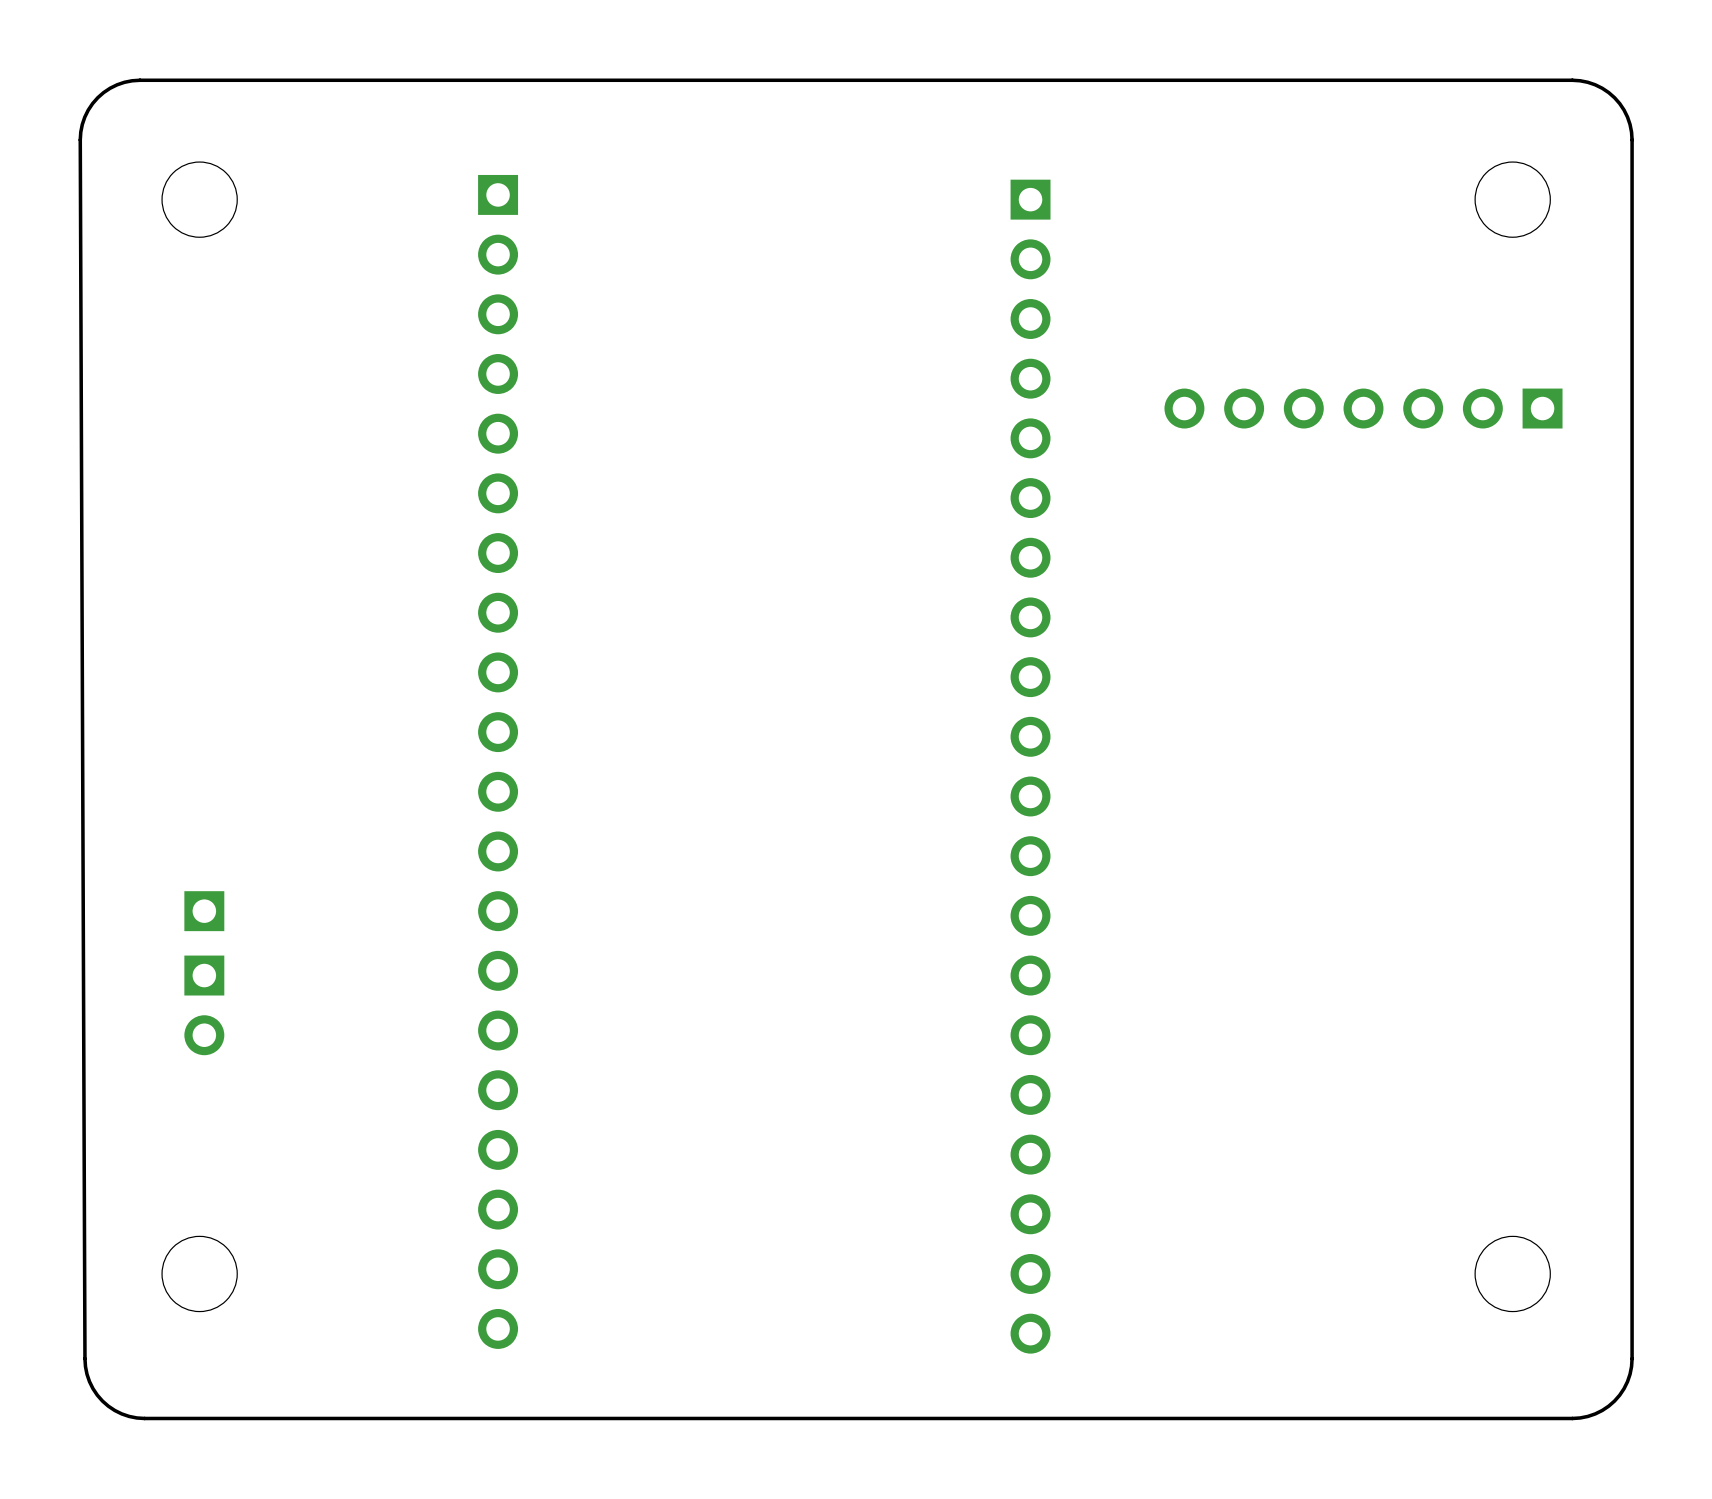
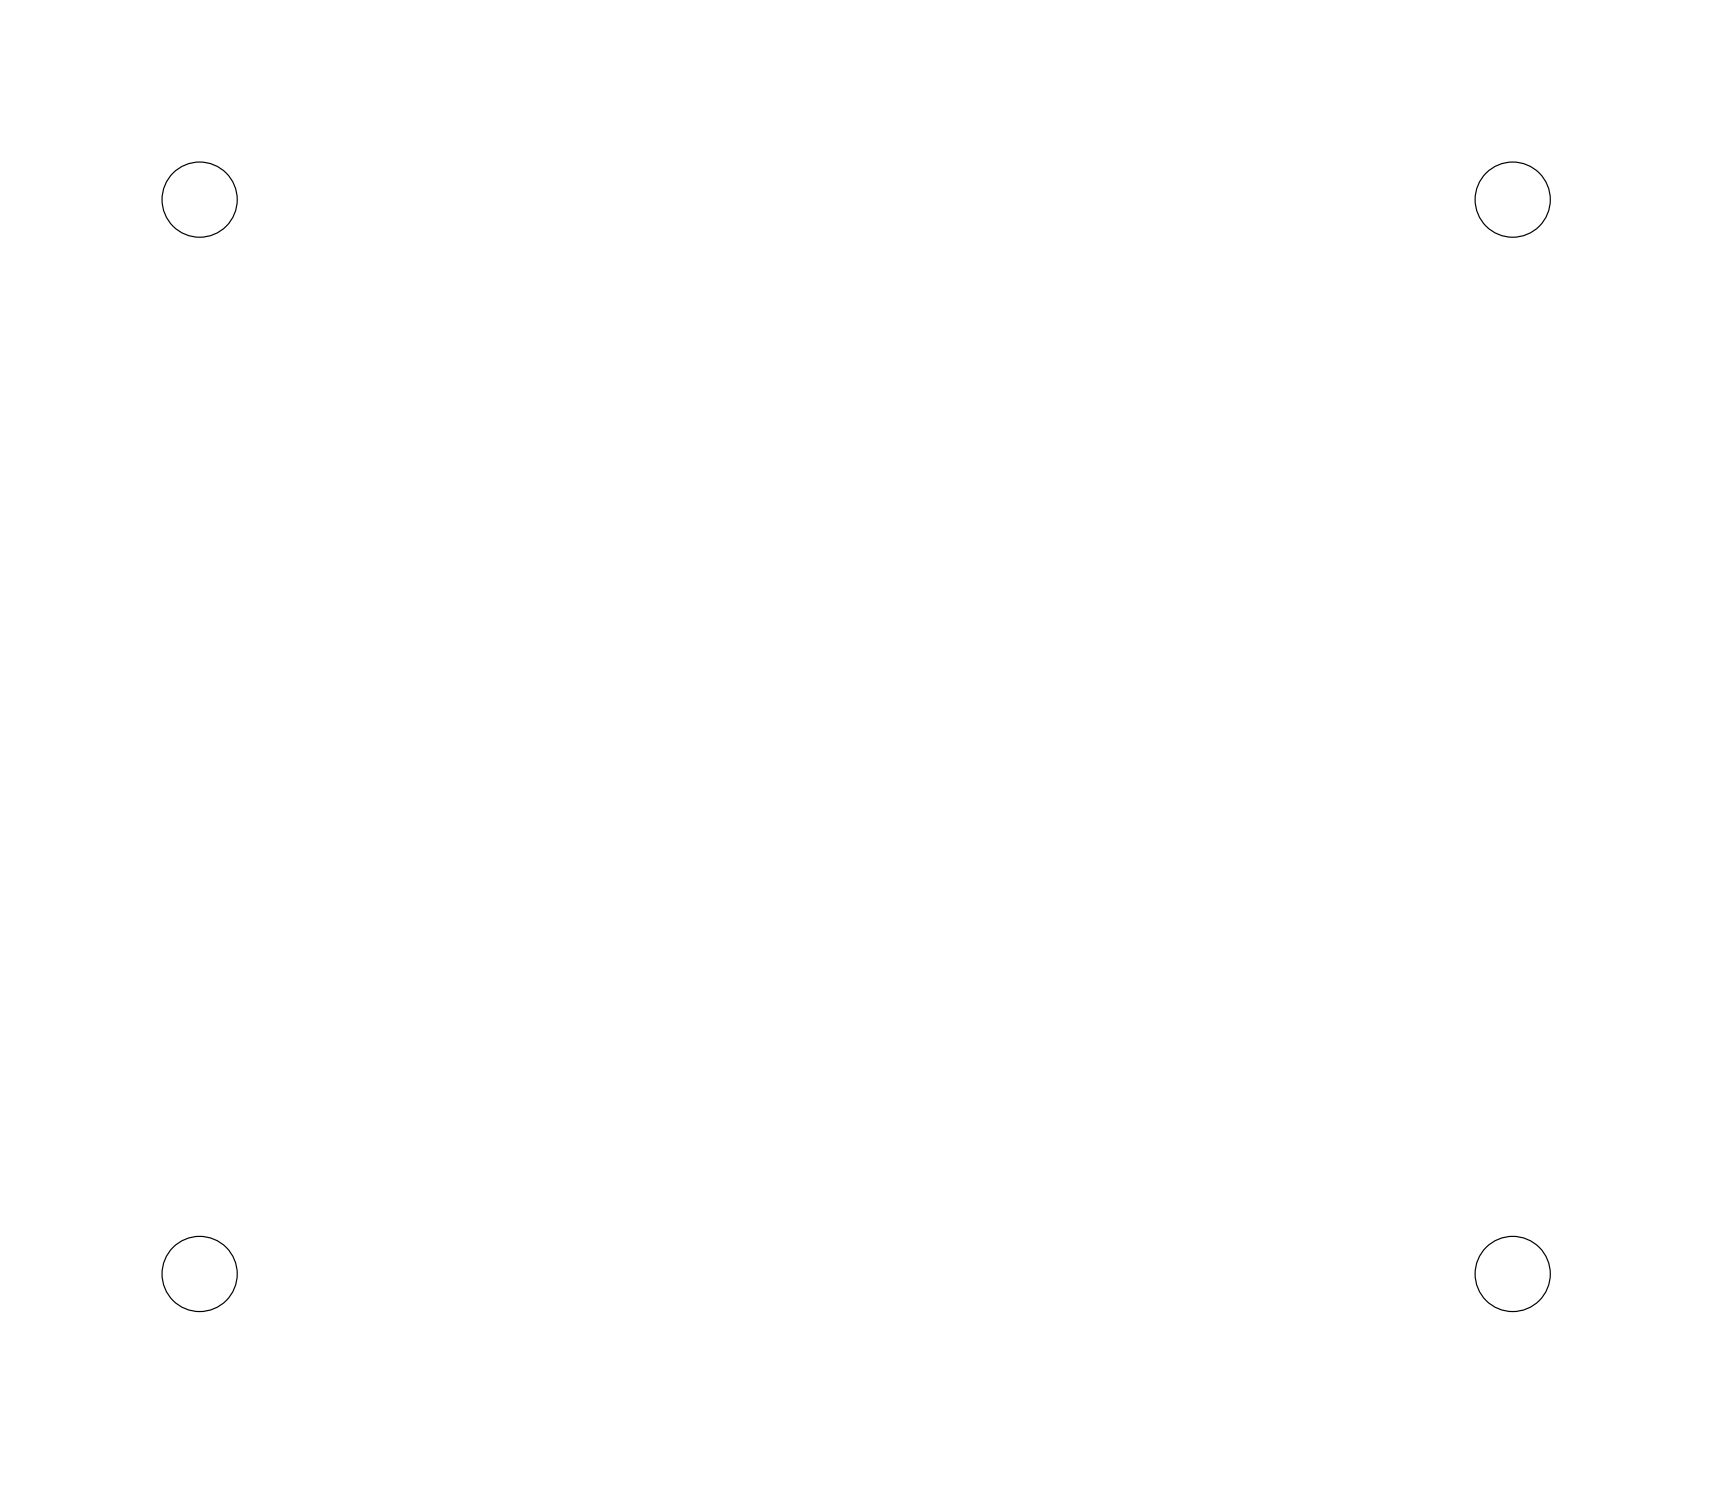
board edge: (1572, 80) (139, 80) (117, 84) (97, 97) (84, 117) (80, 139) (84, 1358) (89, 1381) (102, 1401) (121, 1413) (144, 1418) (1572, 1418) (1595, 1413) (1614, 1401) (1627, 1381) (1632, 1358) (1632, 139) (1627, 117) (1614, 97) (1595, 84) (1572, 80) -> none
part: (1363, 408) -> none
part: (498, 761) -> none
part: (1030, 766) -> none
part: (204, 911) -> none
part: (204, 1005) -> none

